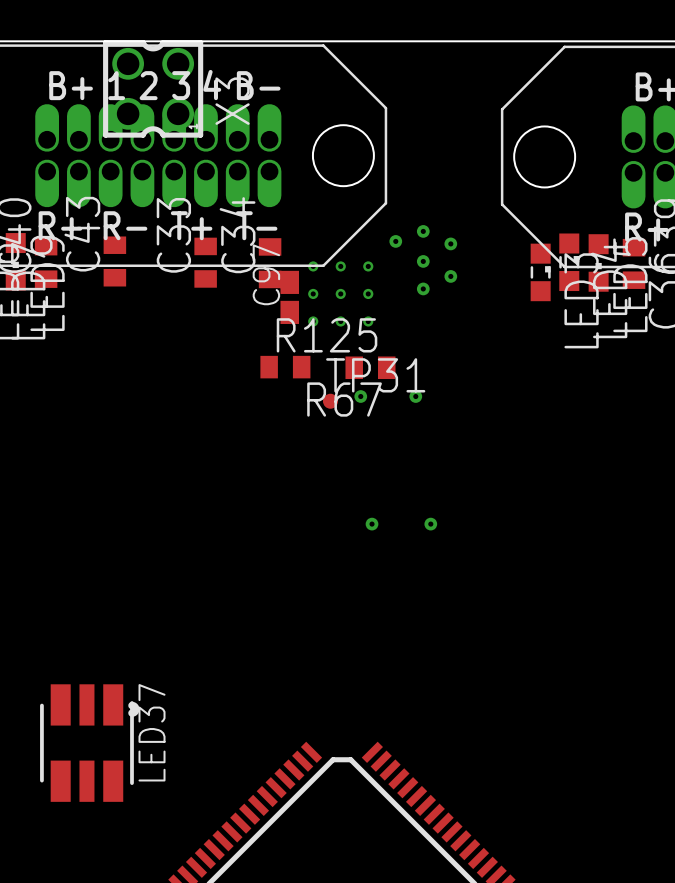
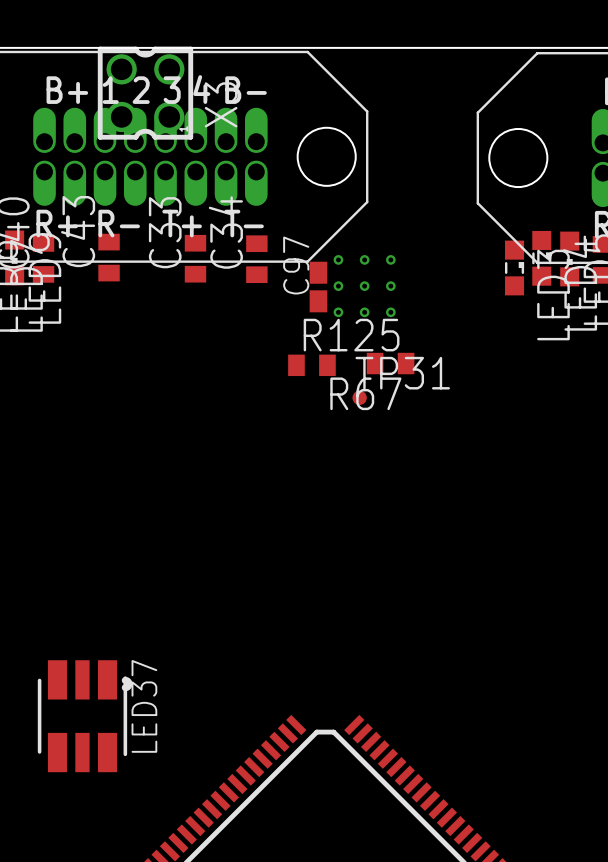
via: (423, 231) -> none
via: (395, 241) -> none
via: (450, 243) -> none
via: (423, 261) -> none
via: (450, 276) -> none
via: (423, 288) -> none
part position: (340, 293) -> (364, 286)
C97 position: (289, 297) -> (318, 287)
R125 position: (285, 367) -> (311, 365)
R67 position: (370, 367) -> (390, 363)
via: (360, 396) -> none
via: (415, 396) -> none
TP31 position: (330, 401) -> (359, 397)
via: (372, 524) -> none
via: (430, 524) -> none

